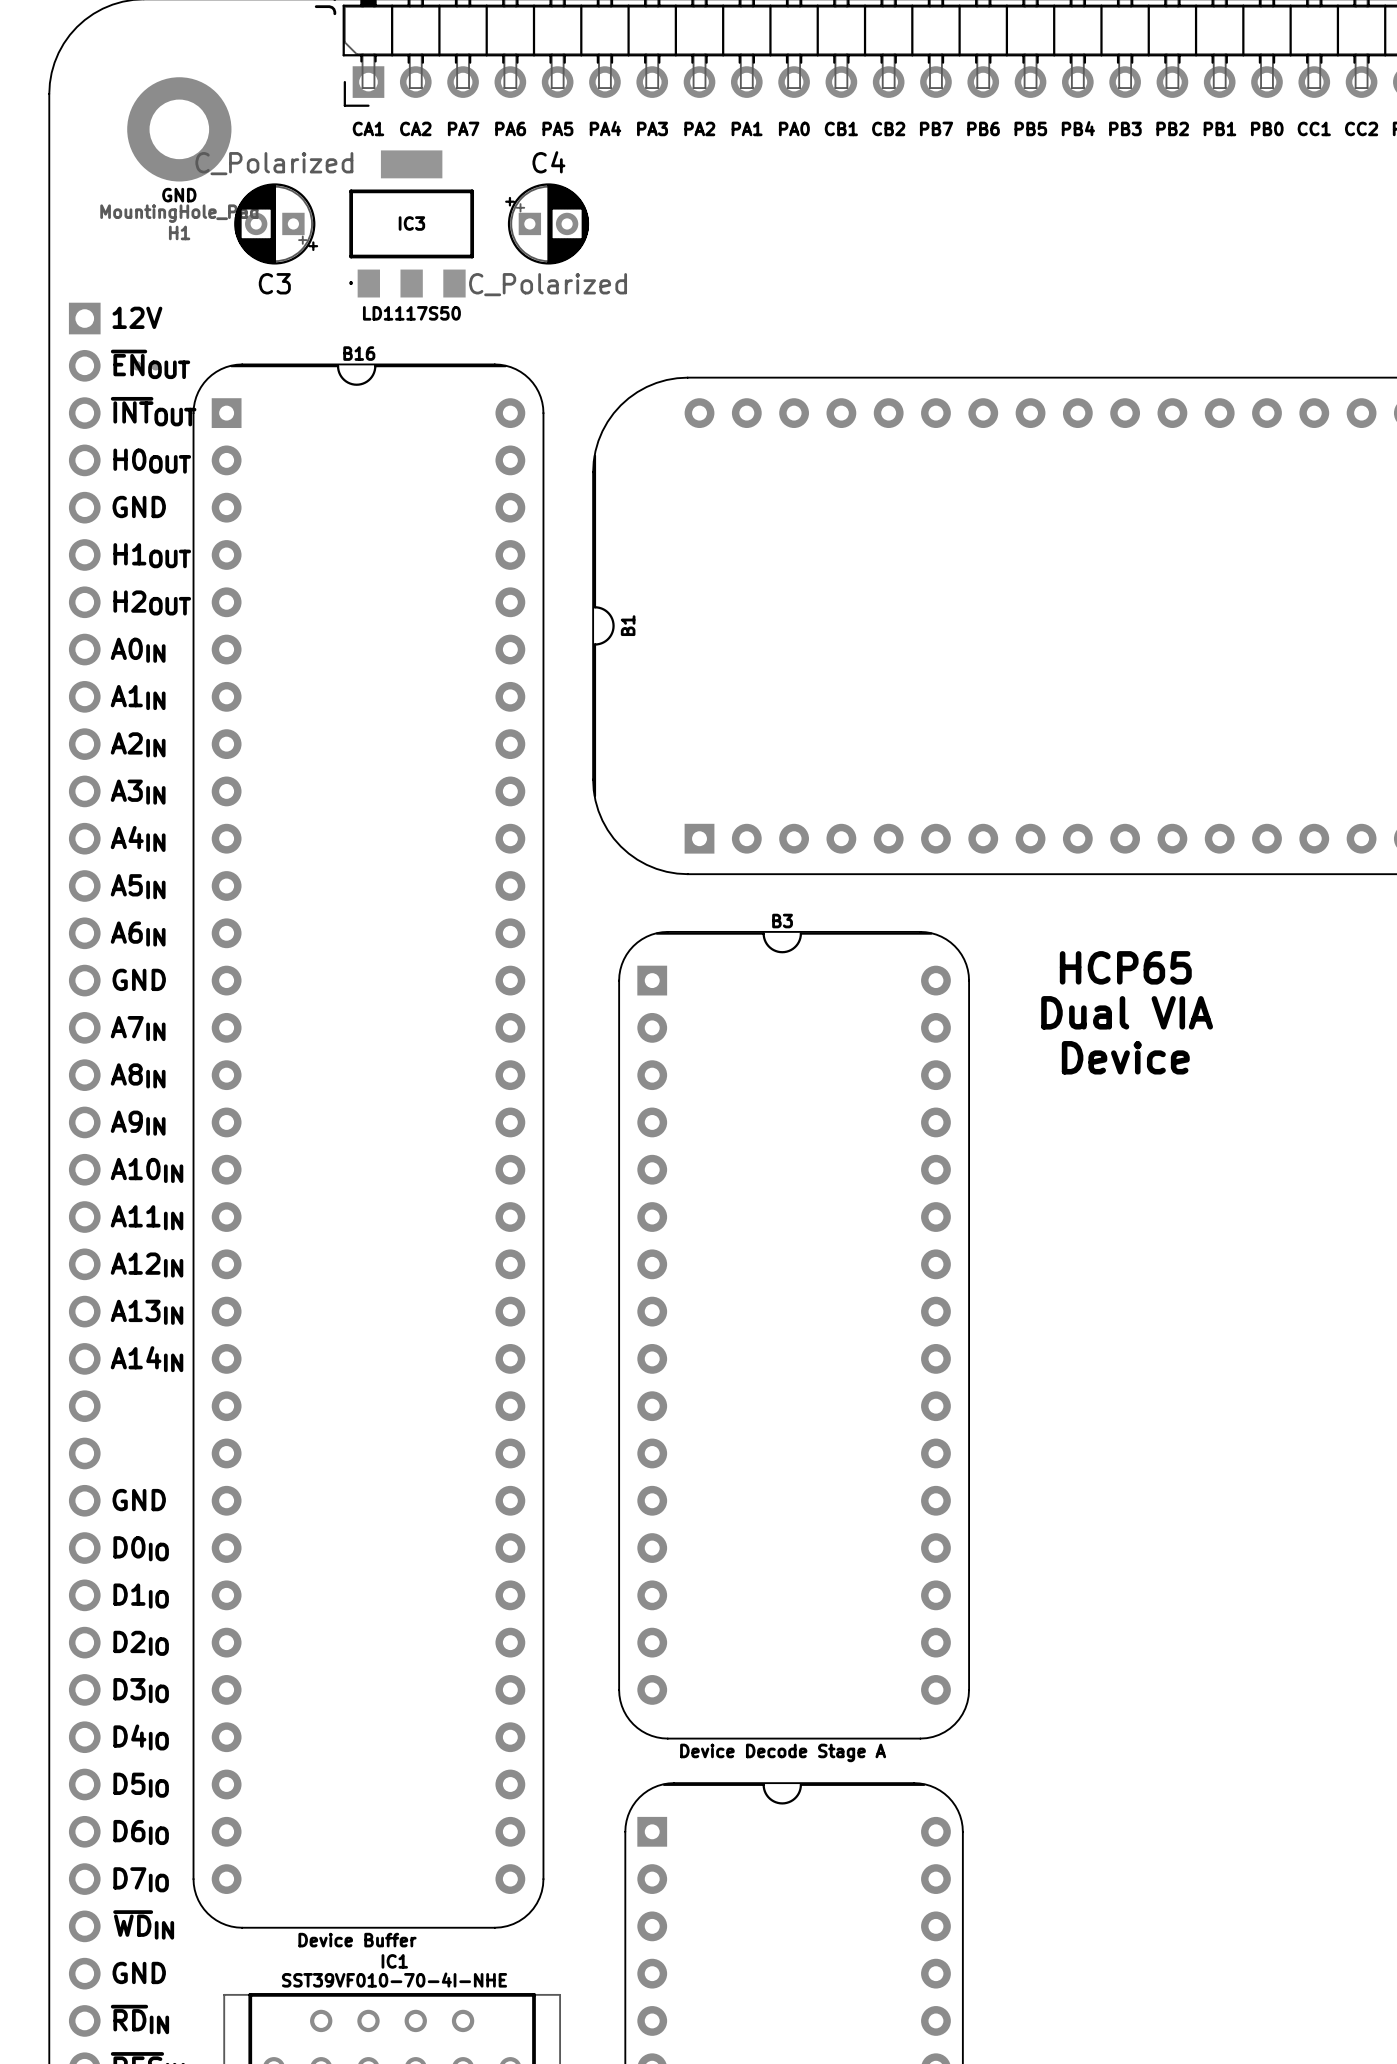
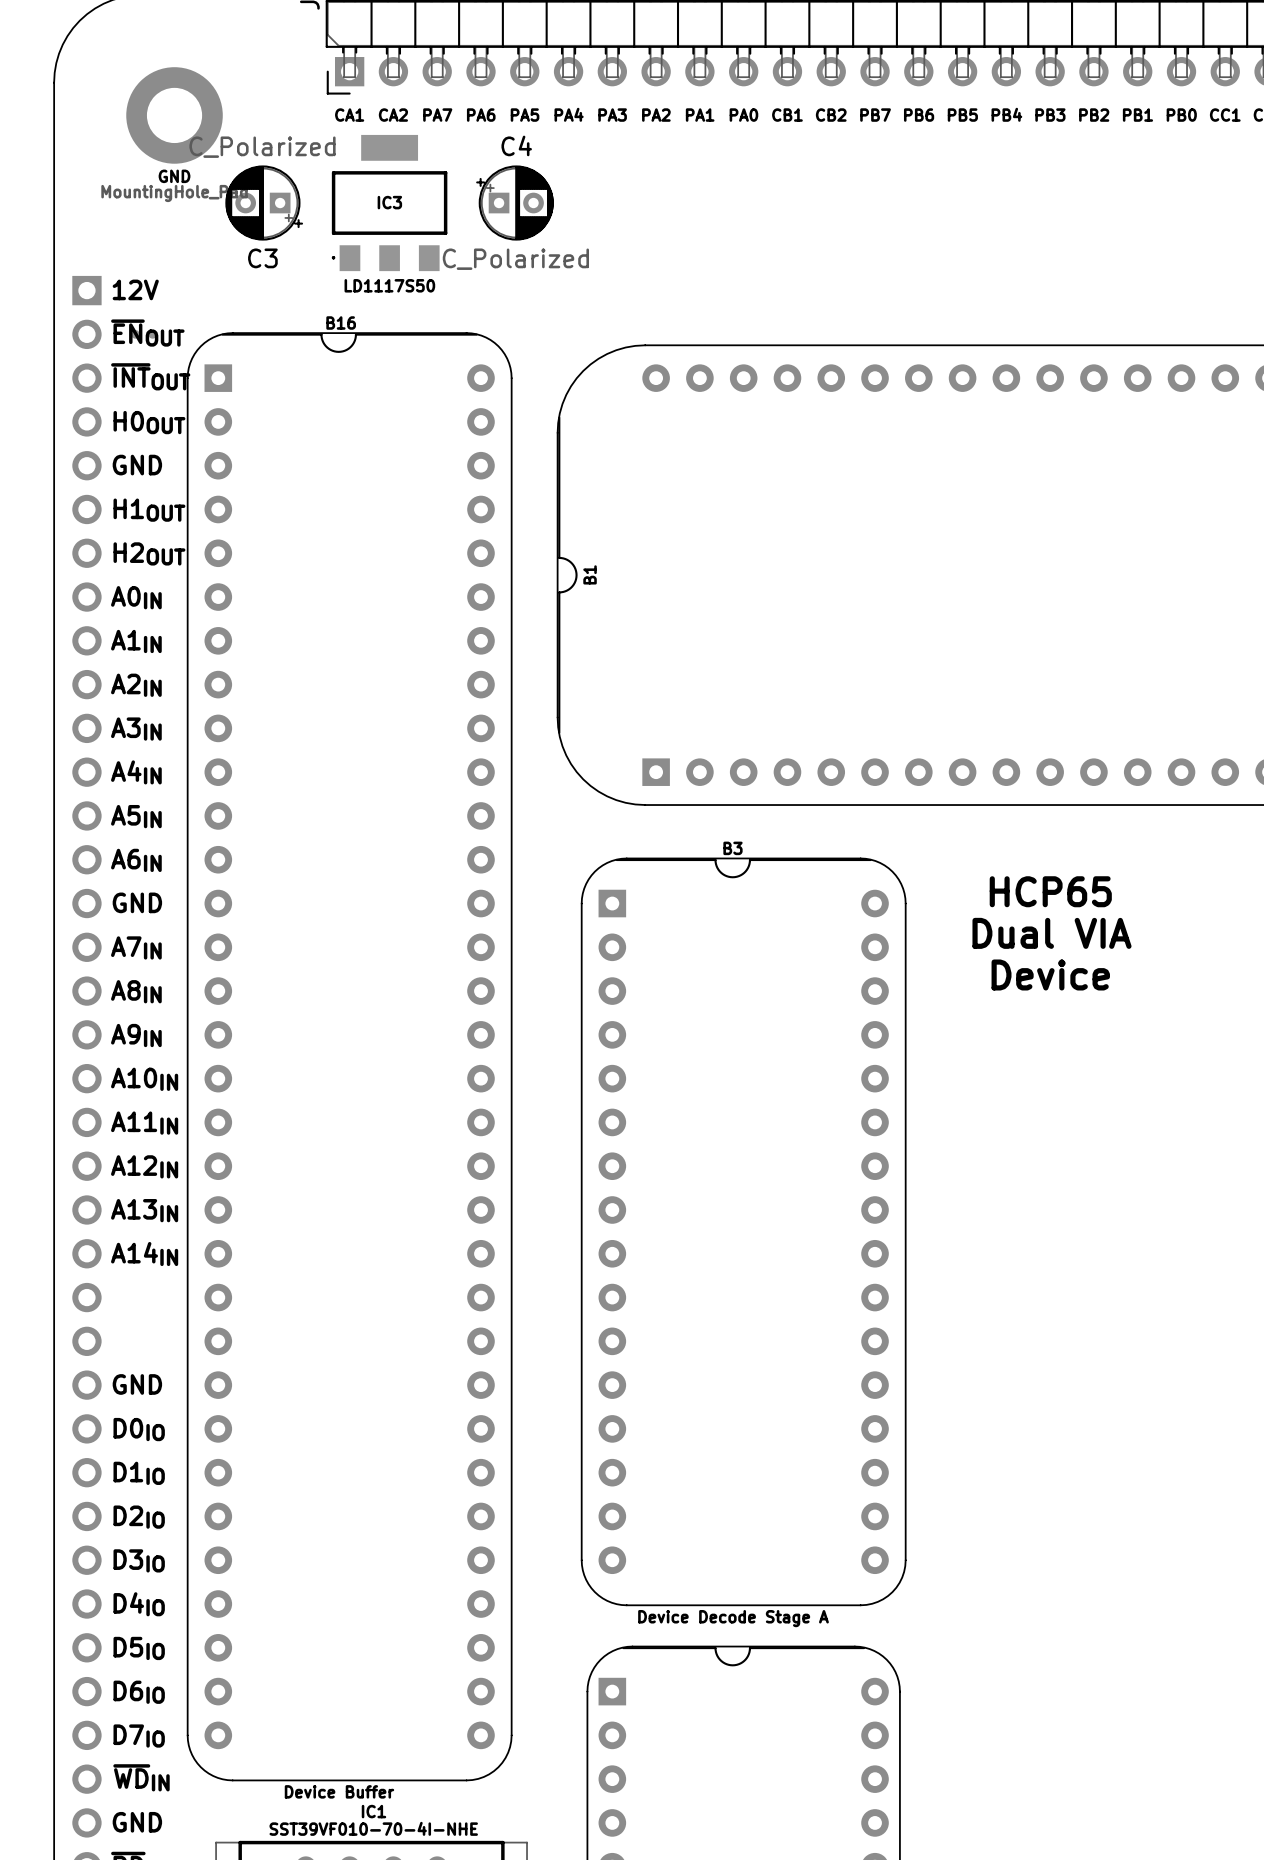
H1 name: H1 (179, 232) -> none

